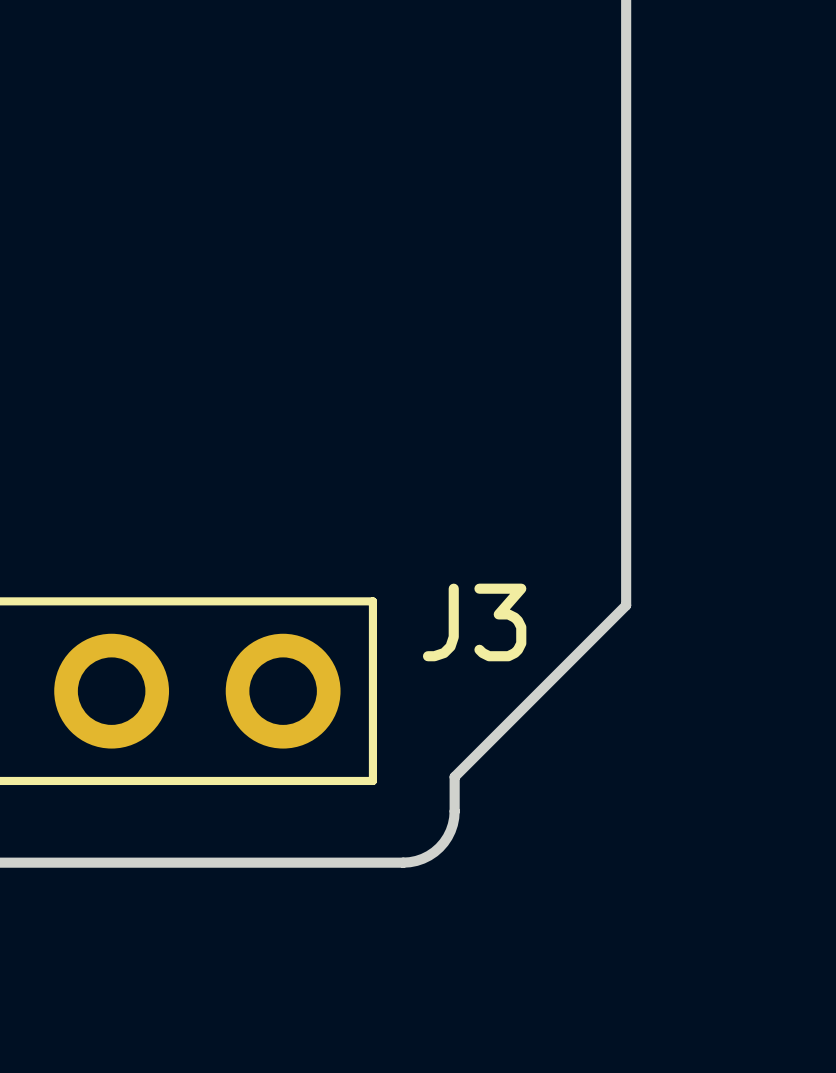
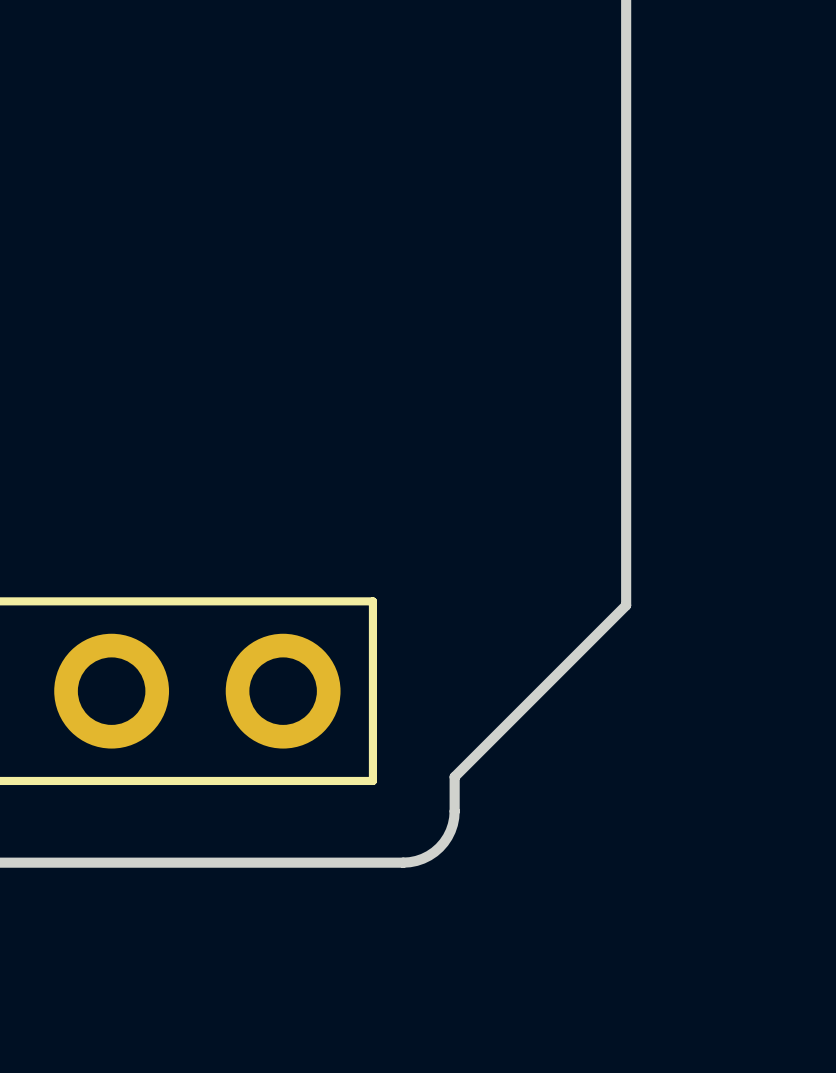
J3 name: J3 (474, 622) -> none

